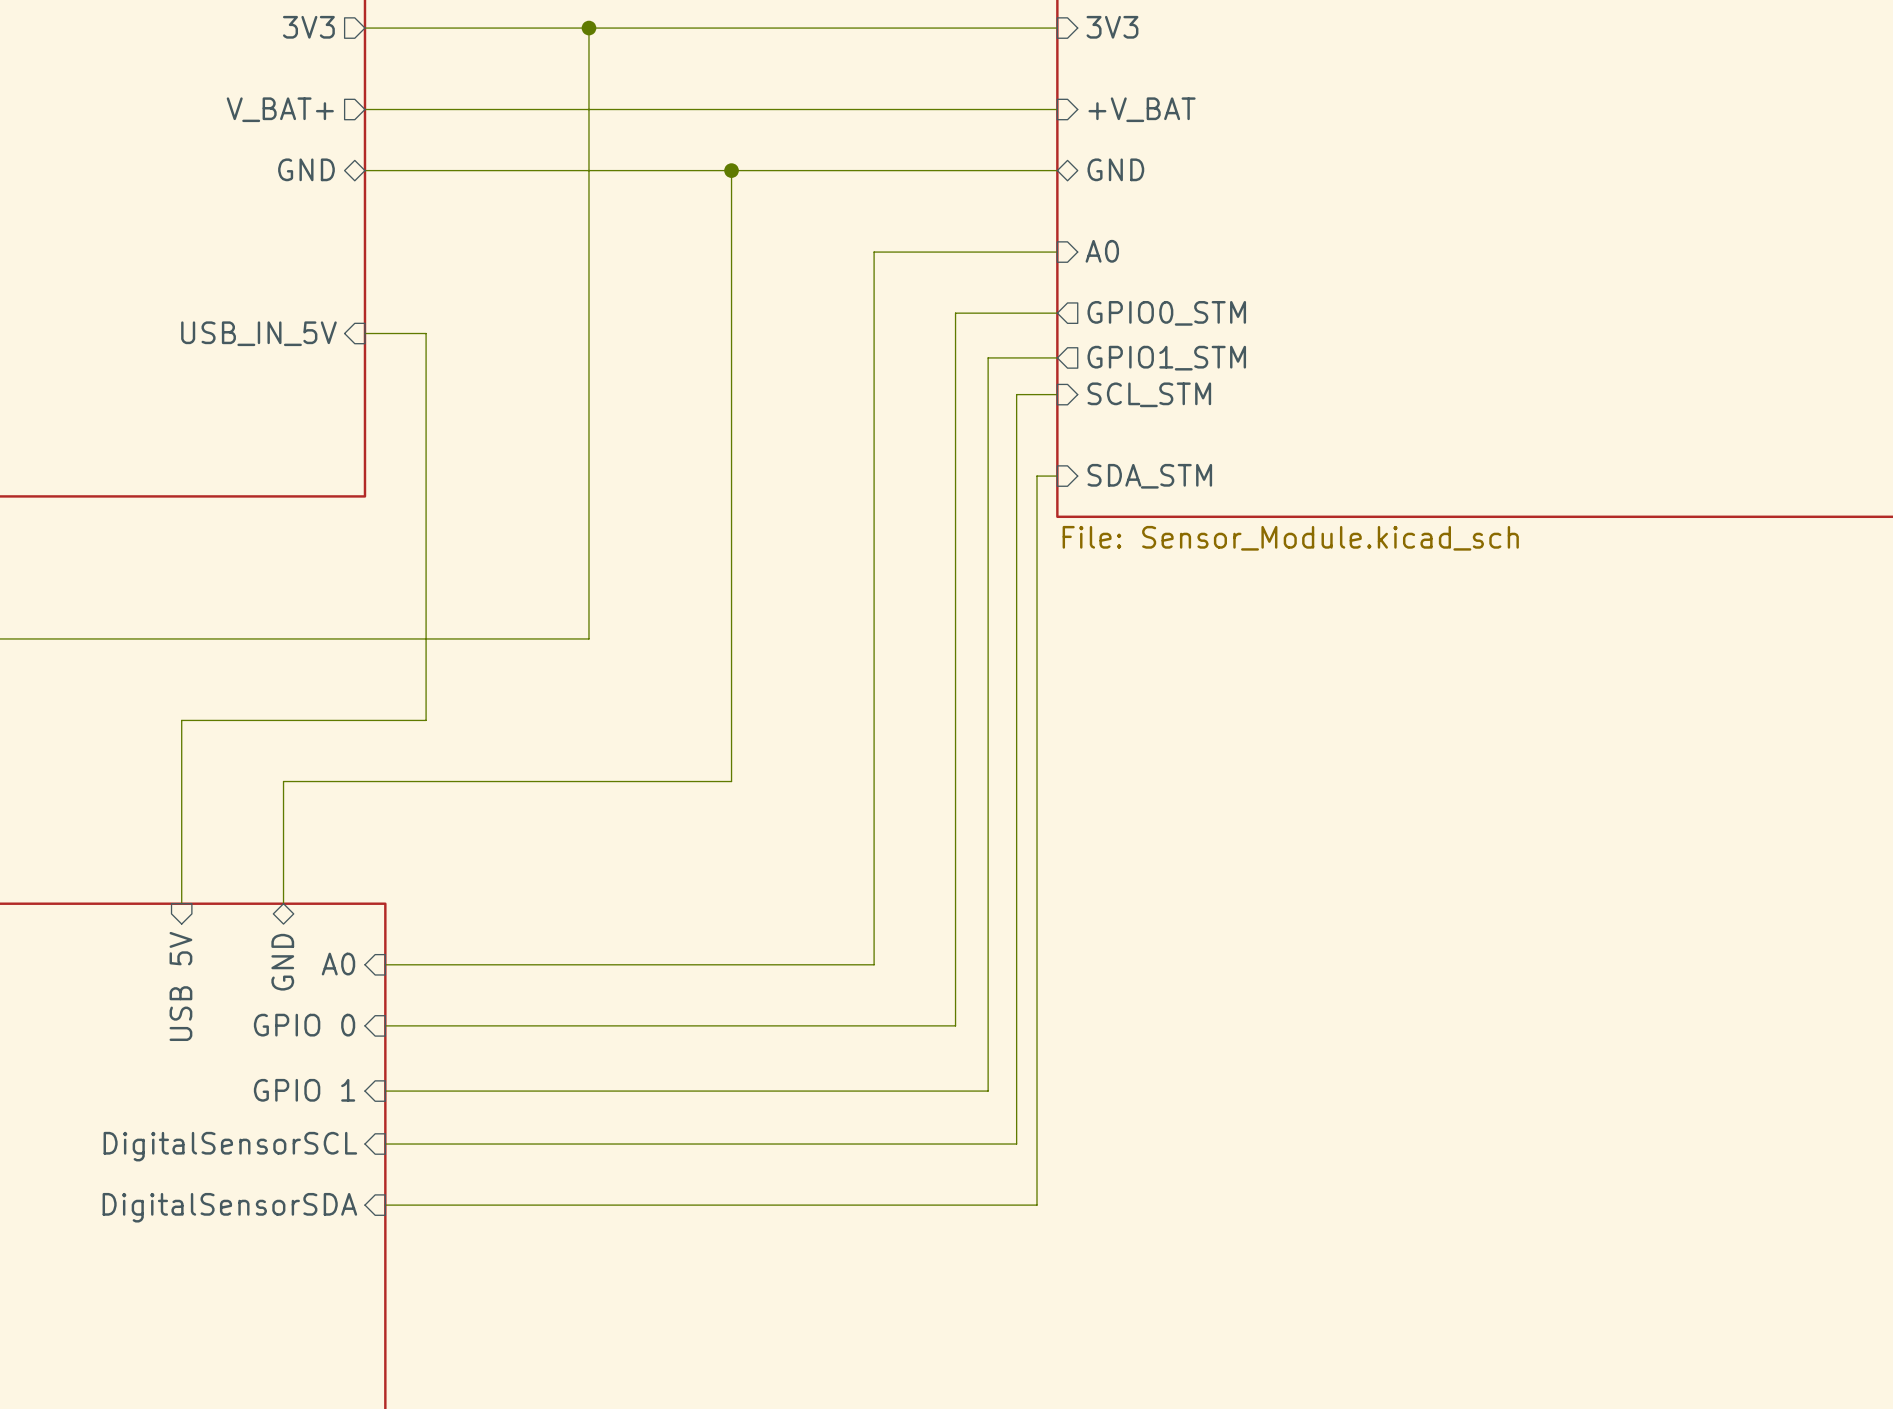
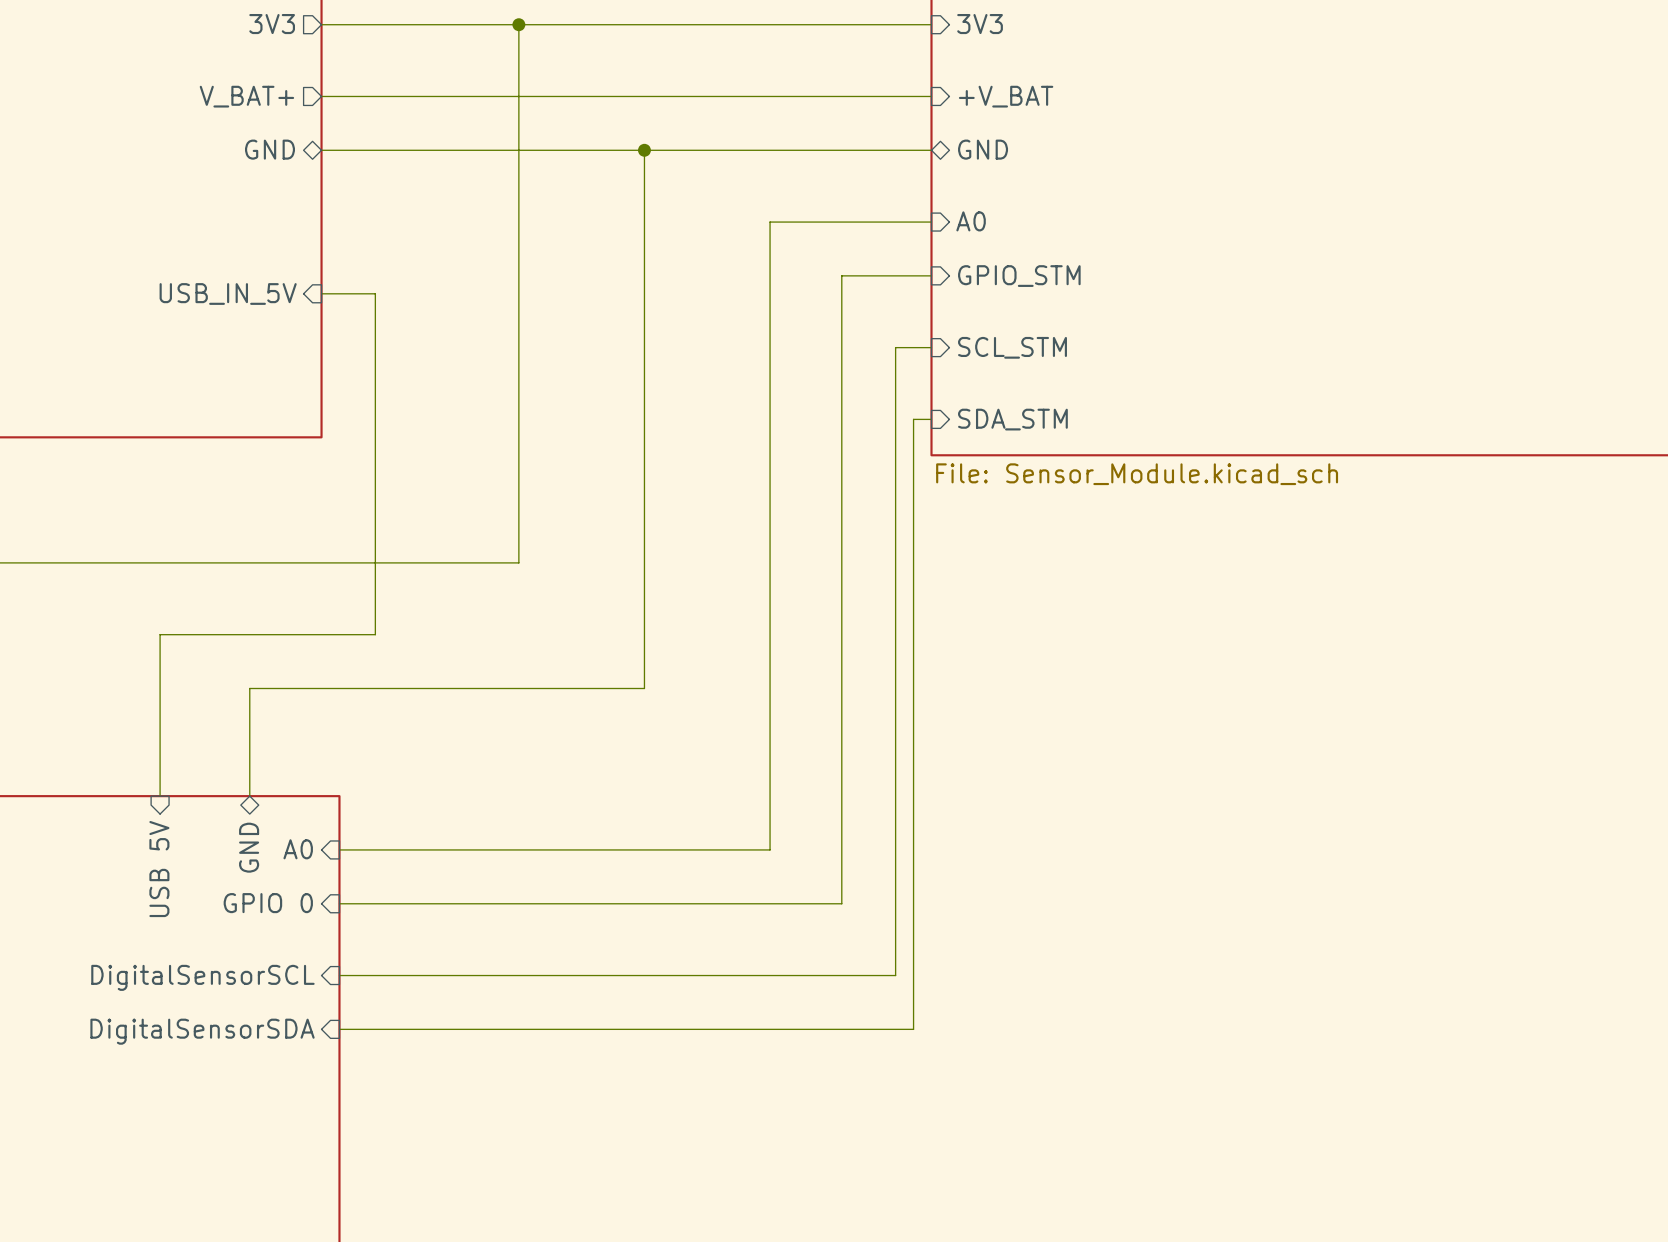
sheet pin shape: output (1166, 313) -> input (1019, 276)
sheet pin: GPIO0_STM (1166, 313) -> GPIO_STM (1019, 276)
wire: (1057, 357) (988, 357) (988, 1091) (385, 1091) -> none
sheet pin: GPIO1_STM (1166, 358) -> none
sheet pin: GPIO 1 (304, 1090) -> none
wire: (1016, 1107) (1016, 1144) (385, 1144) -> (895, 975) (339, 975)
sheet pin position: DigitalSensorSCL (230, 1146) -> DigitalSensorSCL (202, 977)
wire: (1037, 1168) (1037, 1205) (385, 1205) -> (913, 1029) (339, 1029)
sheet pin position: DigitalSensorSDA (229, 1207) -> DigitalSensorSDA (202, 1031)

